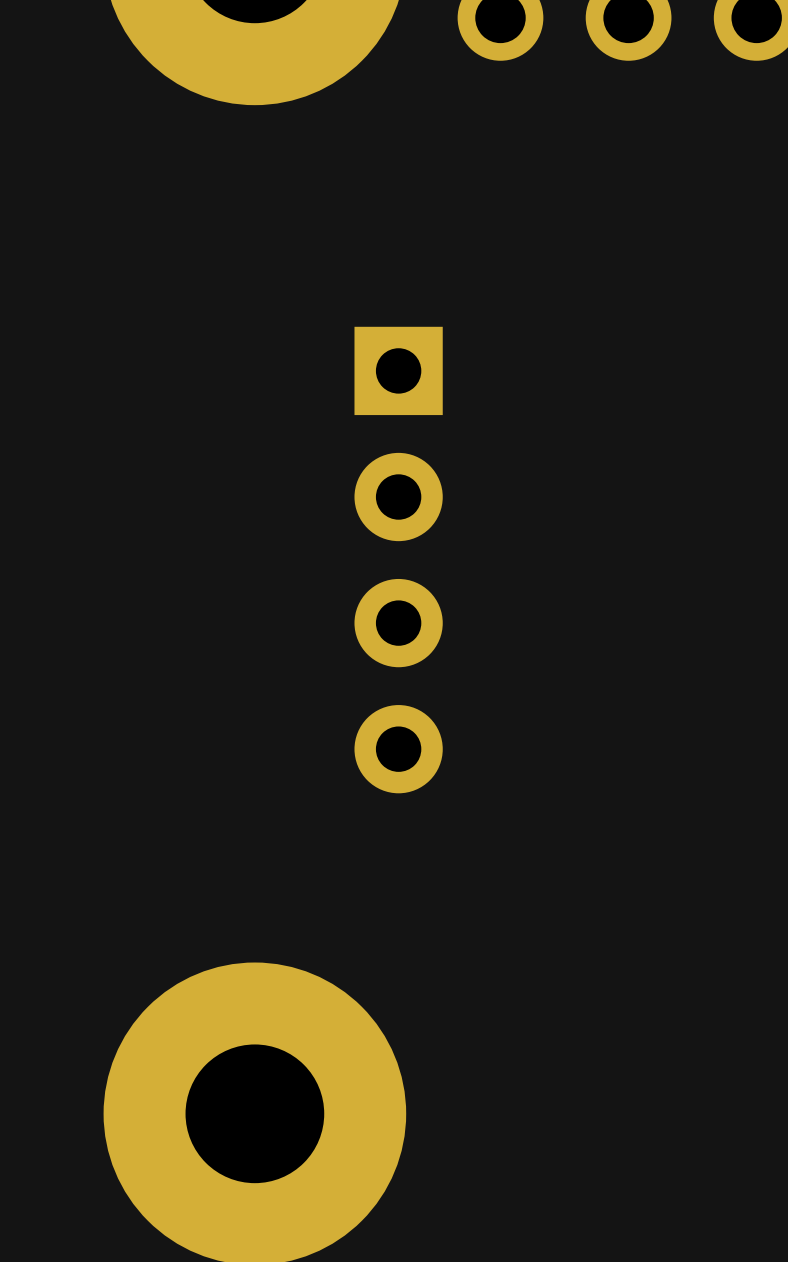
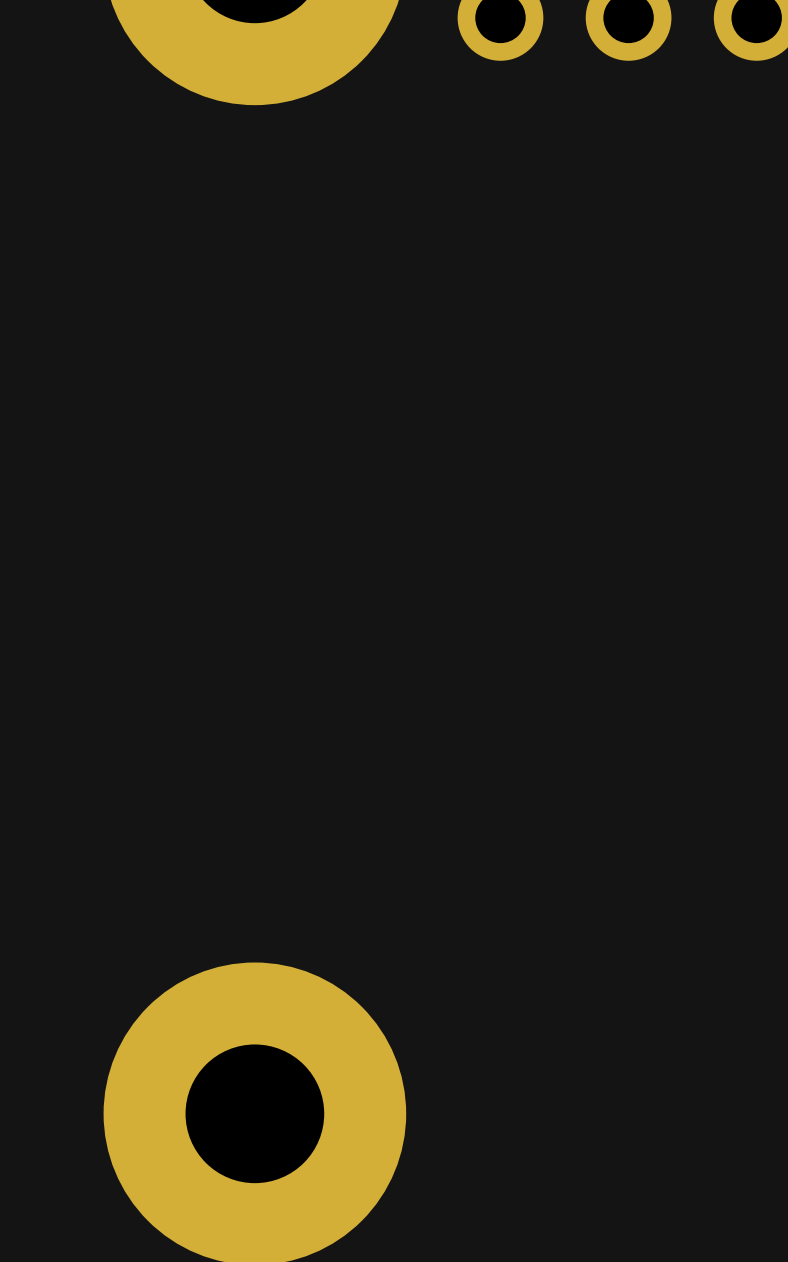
part: (398, 560) -> none

